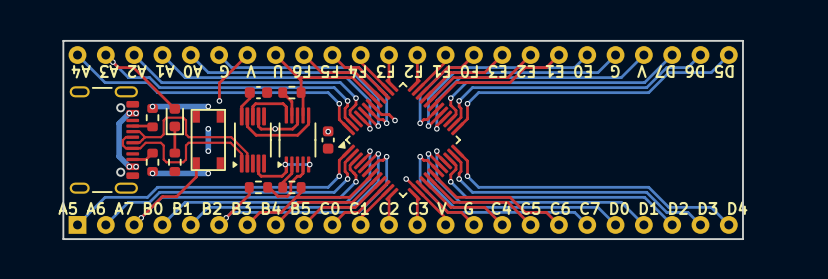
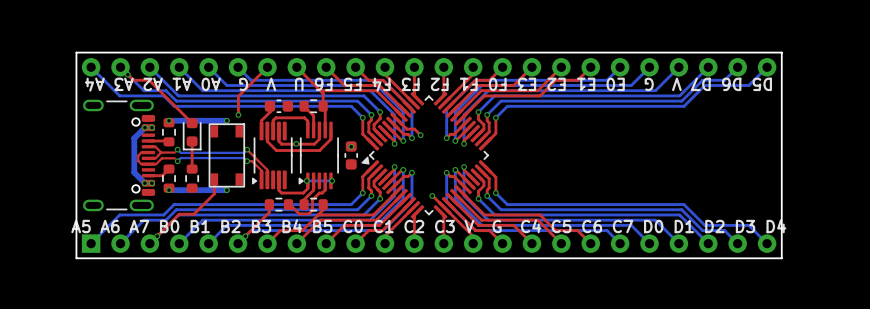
bottom track: (208, 128) (208, 151) -> none
via: (208, 128) -> none
bottom track: none -> (177, 149) (180, 152) (243, 152) (247, 149)
via: none -> (177, 149)
via: none -> (247, 149)
top track: (158, 137) (163, 134) (163, 120) (166, 117) (183, 117) (185, 120) (185, 134) (188, 137) (231, 137) (247, 153) -> (247, 149) (267, 169)
top track: (158, 142) (163, 145) (163, 159) (166, 162) (183, 162) (185, 159) (185, 145) (188, 142) (230, 142) (241, 154) -> (247, 161) (252, 161) (261, 170)
bottom track: none -> (177, 161) (180, 158) (243, 158) (247, 161)
via: none -> (177, 161)
via: none -> (247, 161)
via: (208, 151) -> none

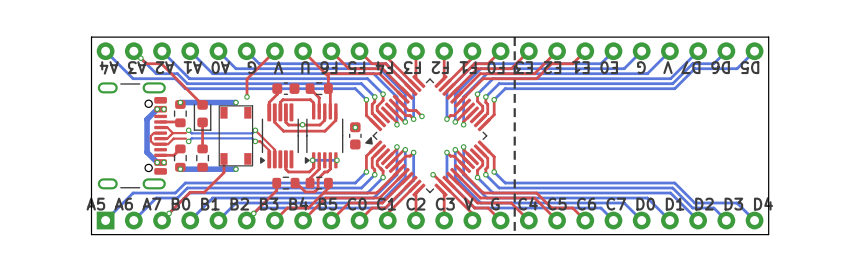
line: none -> (514, 37) (514, 234)

